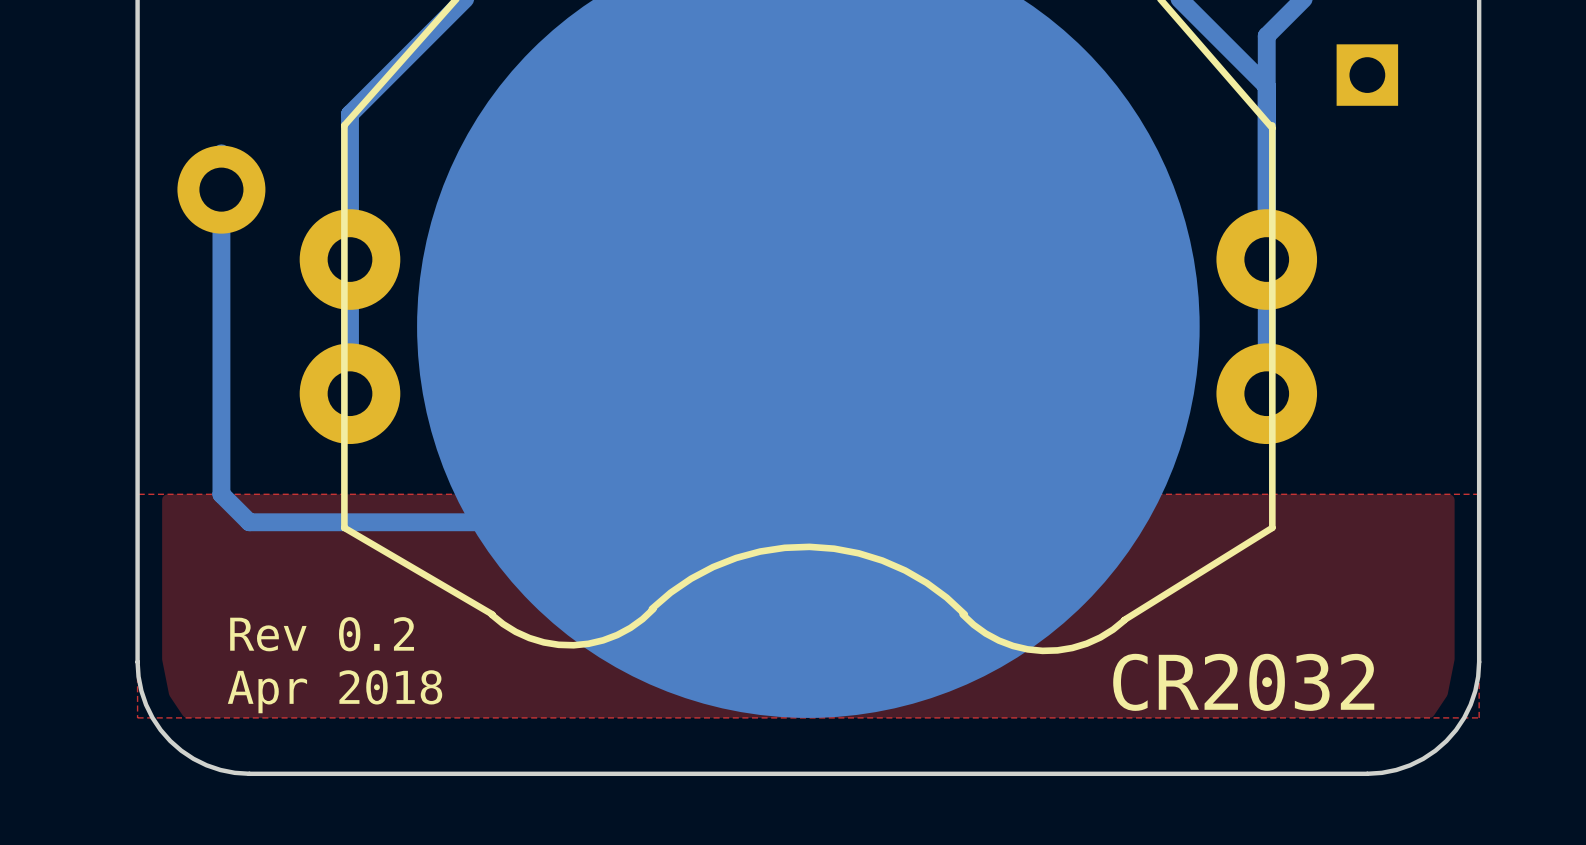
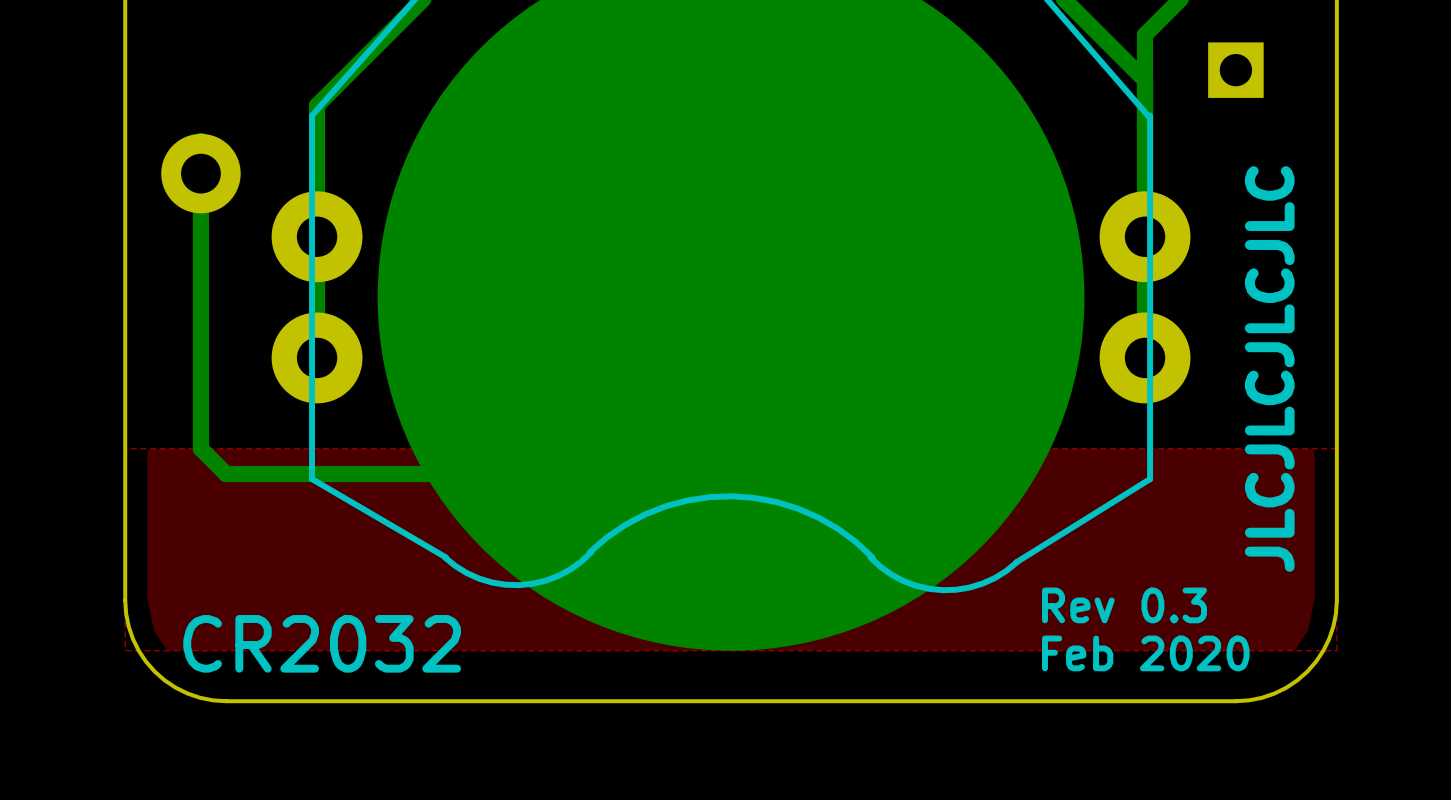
text: none -> JLCJLCJLCJLC (1269, 368)
text: Rev 0.2 (322, 634) -> none
text: none -> Rev 0.3 (1124, 605)
text position: CR2032 (1243, 682) -> CR2032 (322, 643)
text: Apr 2018 (335, 691) -> none
text: none -> Feb 2020 (1145, 653)

